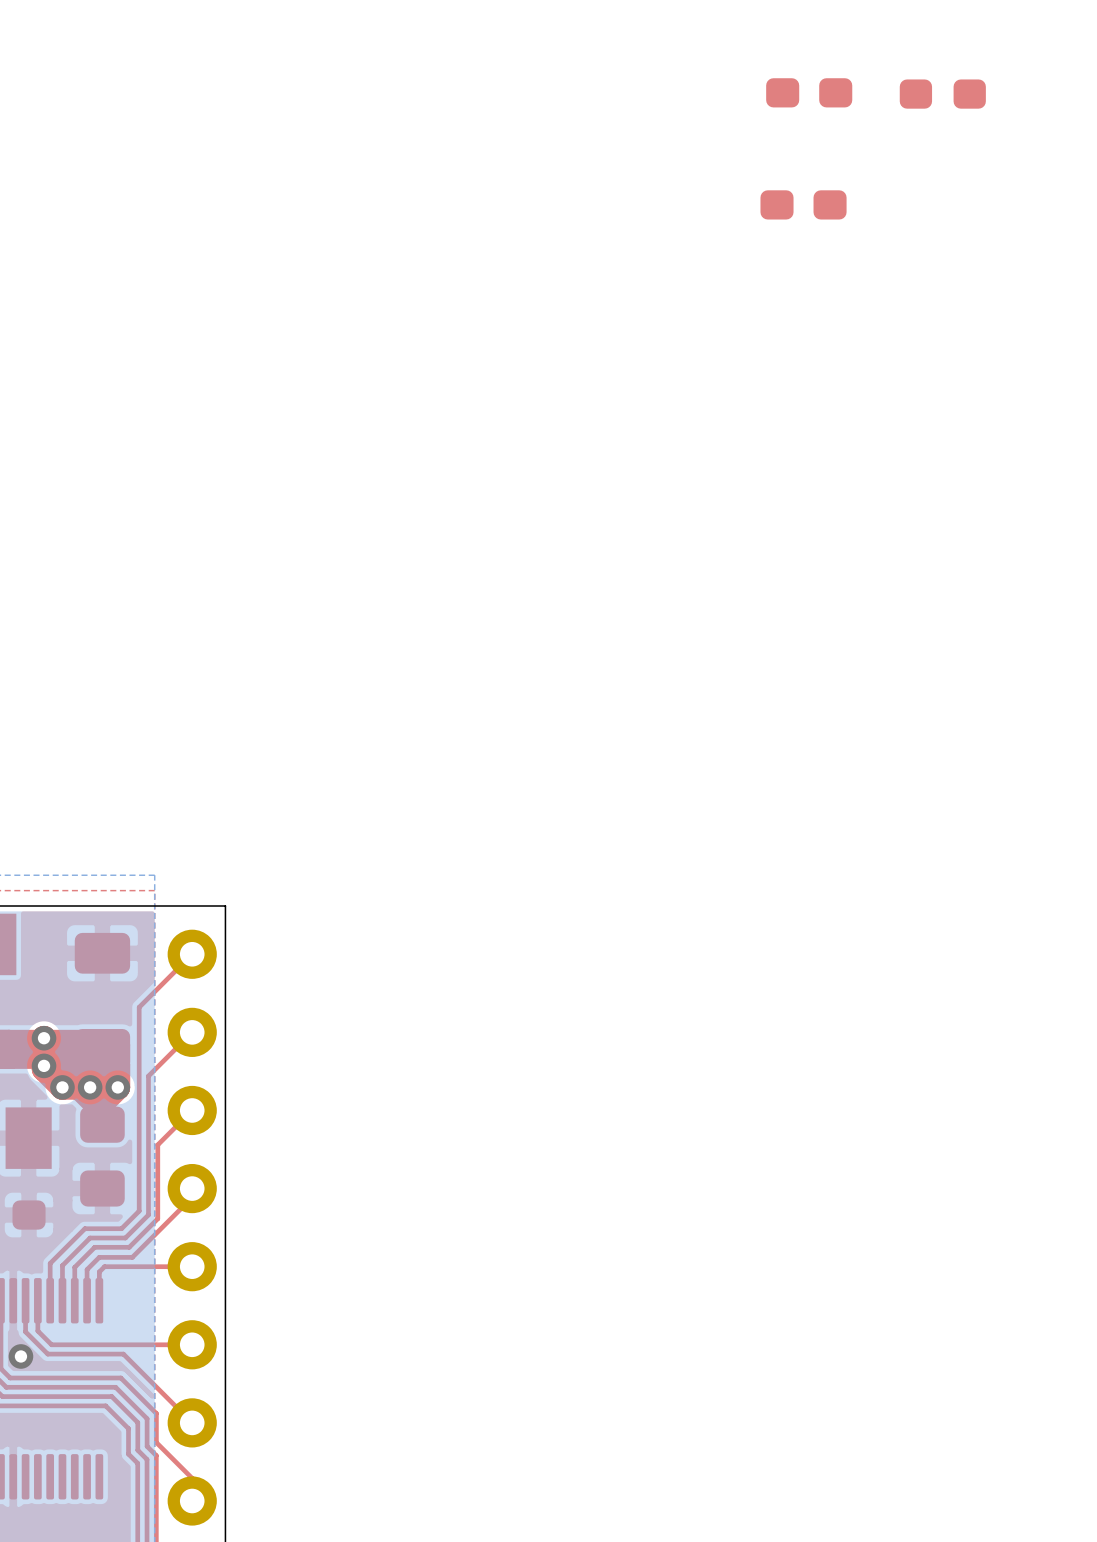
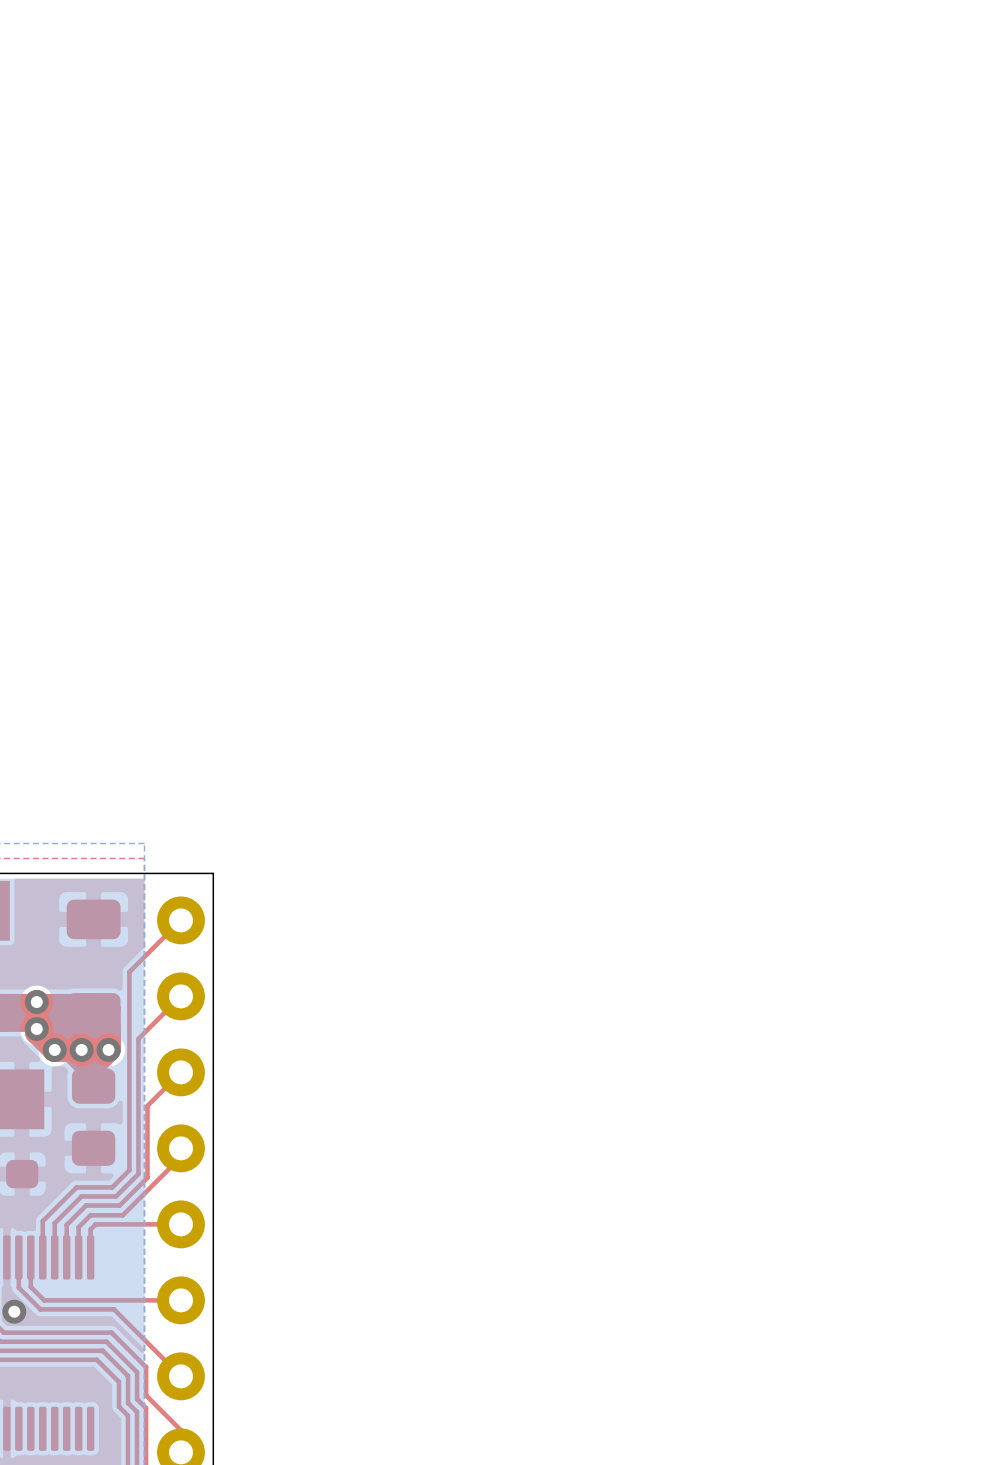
part: (809, 92) -> none
part: (942, 94) -> none
part: (803, 204) -> none

